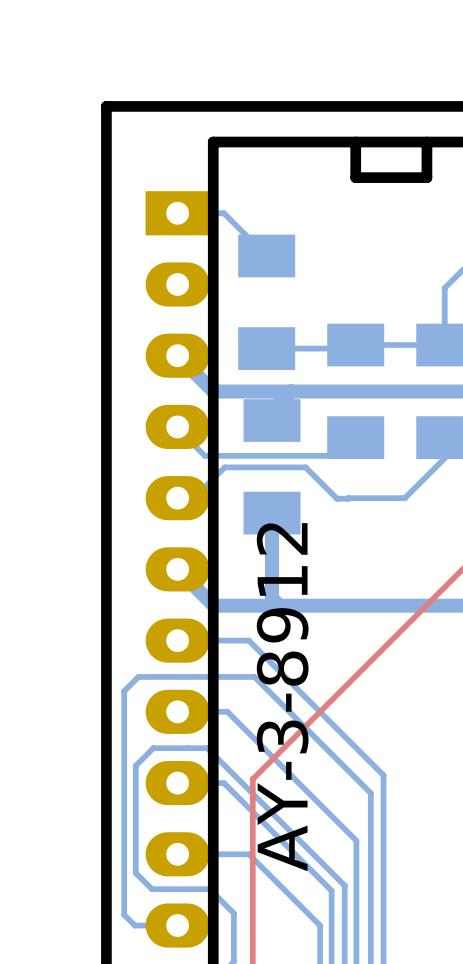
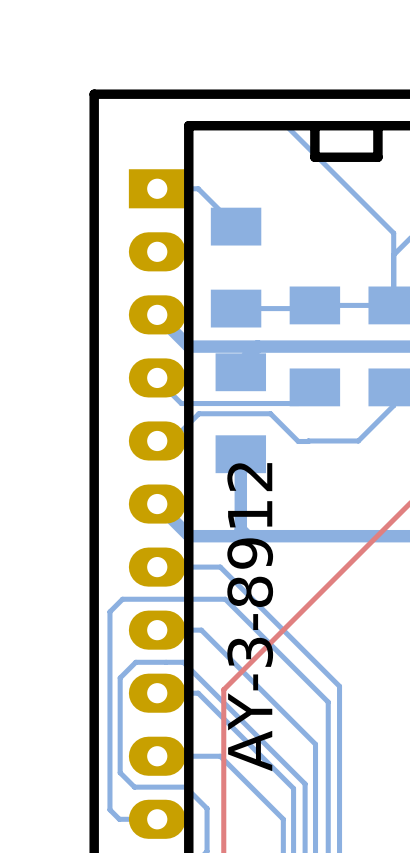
bottom track: none -> (285, 124) (393, 233) (393, 254)

